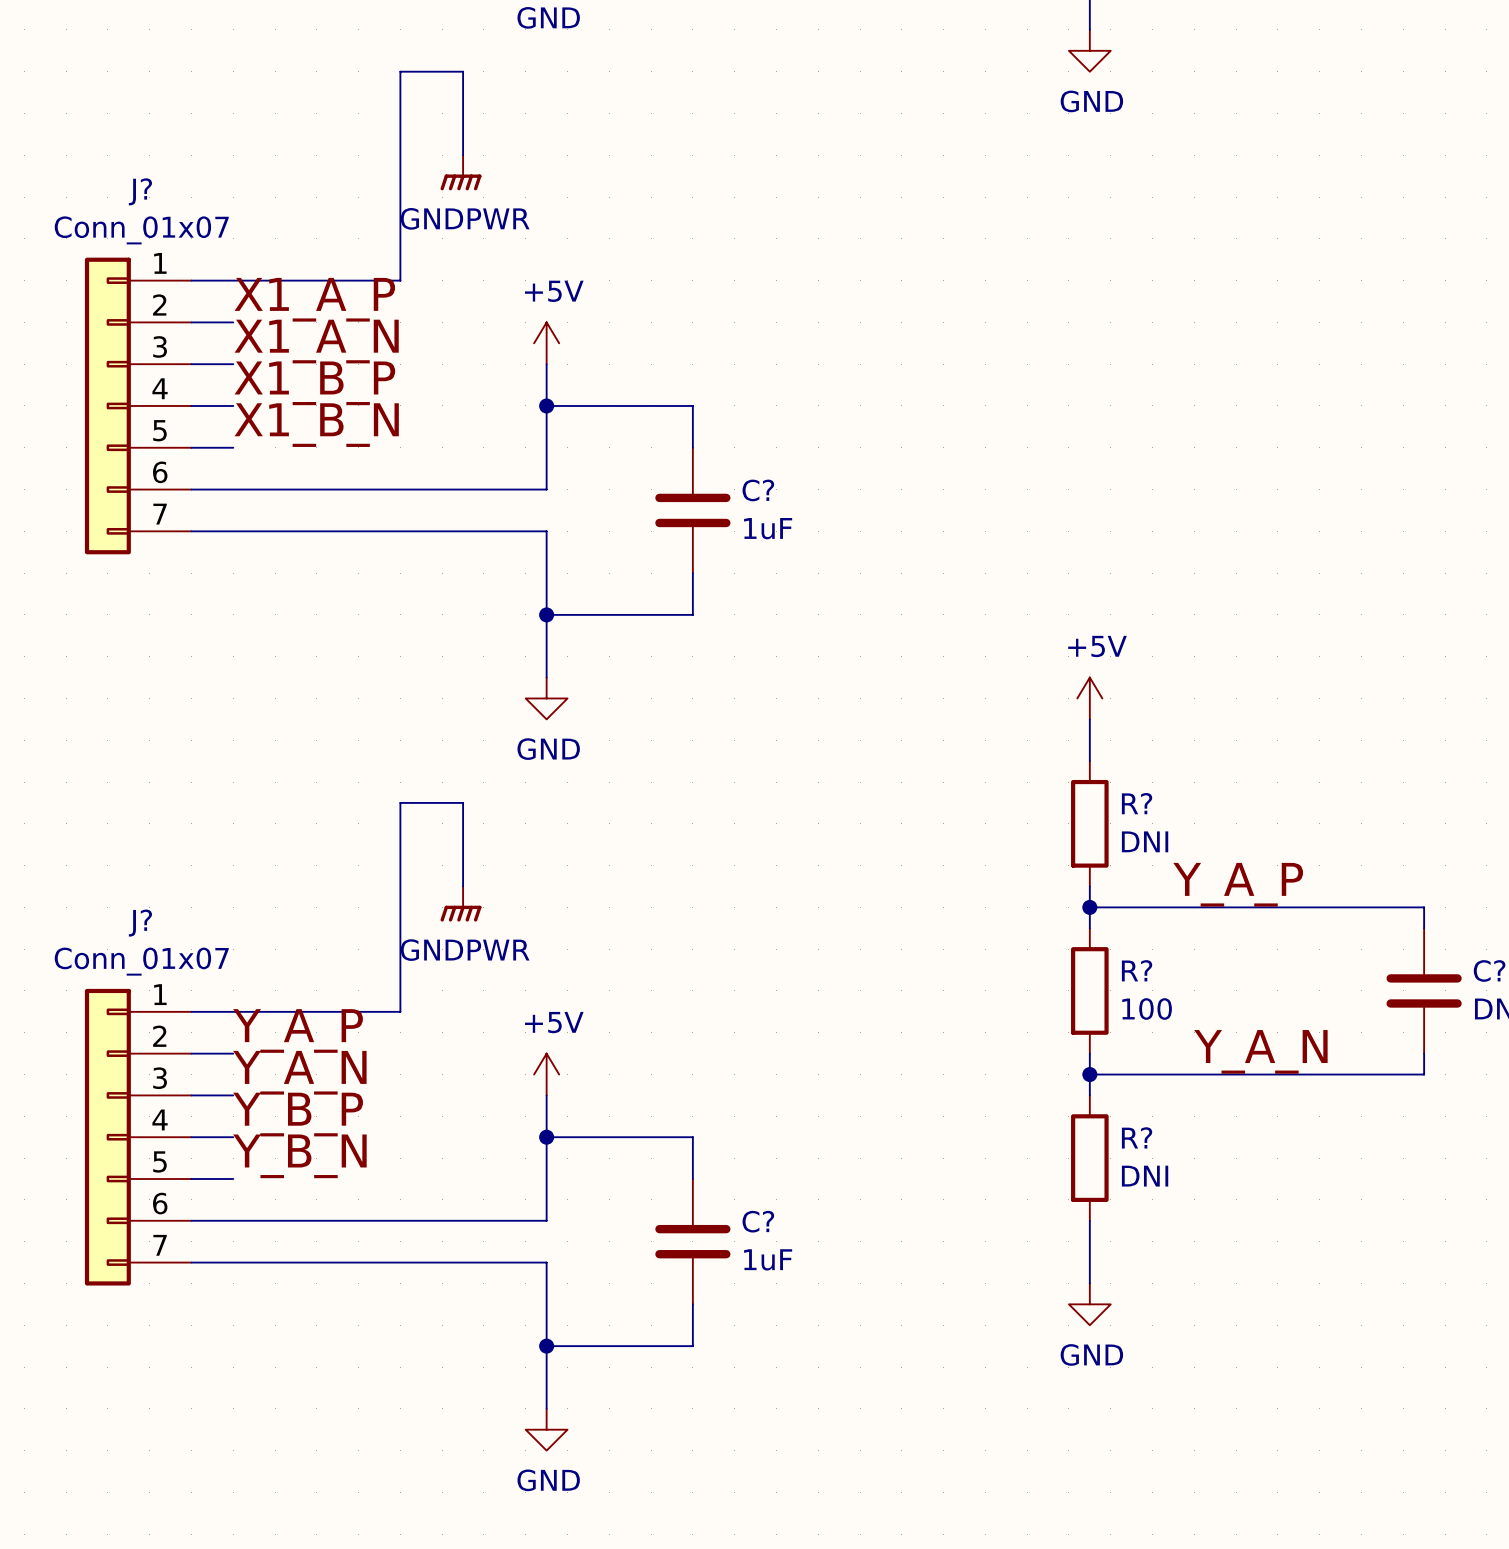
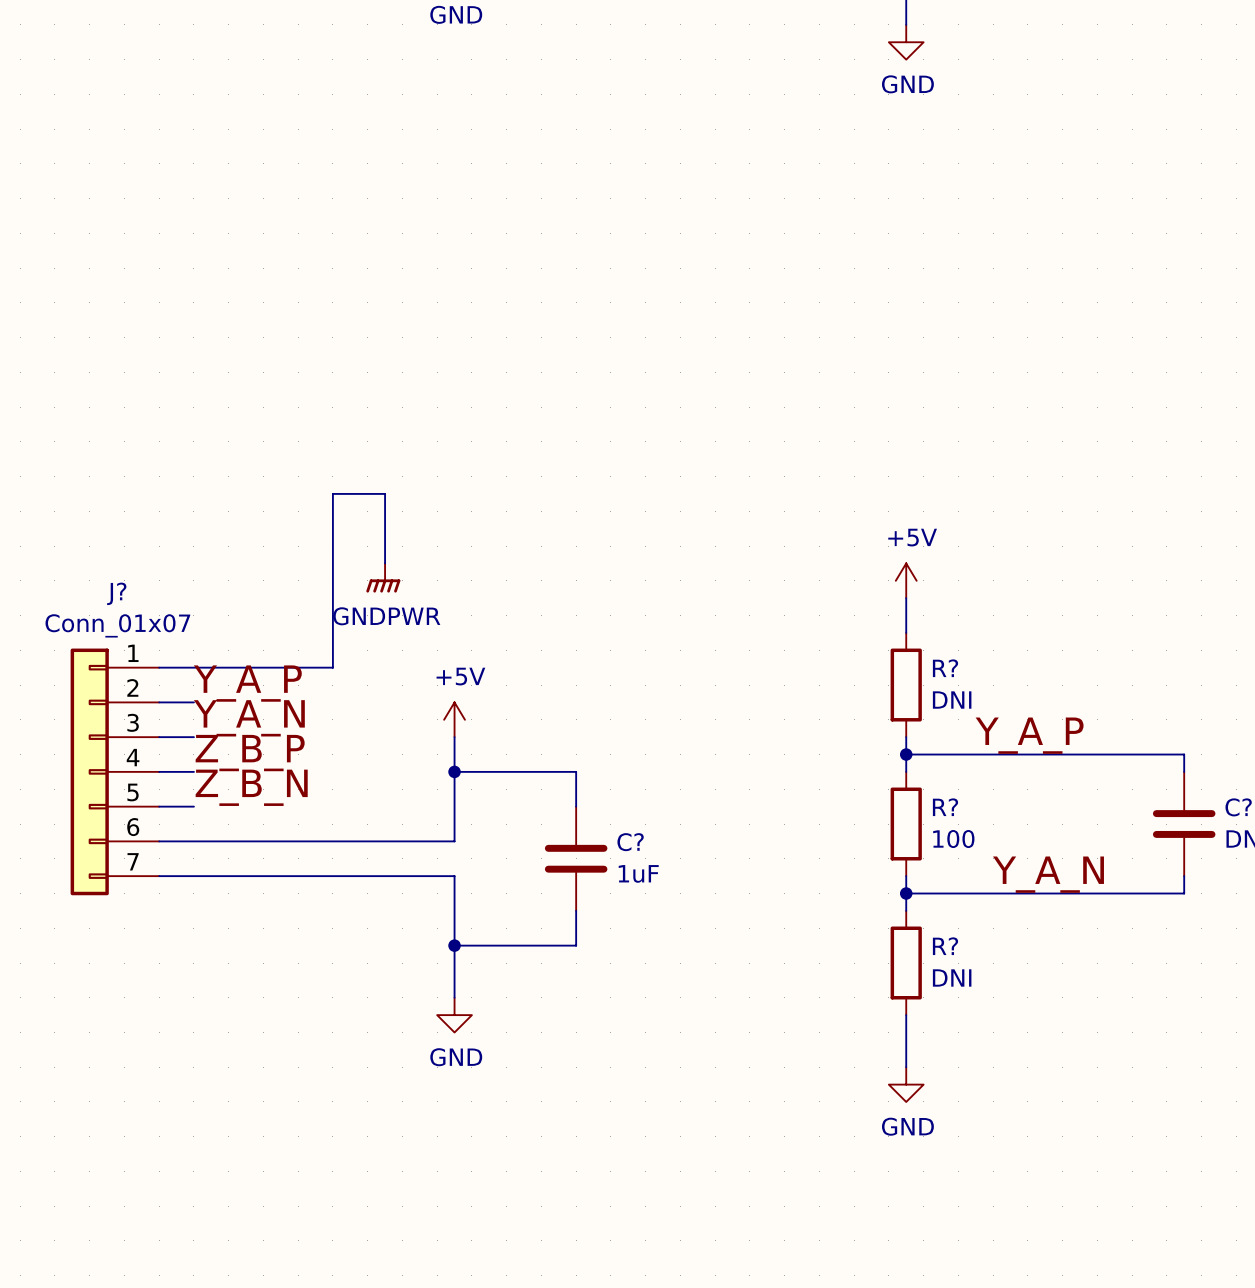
wire: (463, 155) (463, 71) (400, 71) (400, 280) (191, 280) -> none
power symbol: GNDPWR (460, 172) -> none
label: X1_A_P (314, 299) -> none
wire: (191, 322) (233, 322) -> none
label: X1_A_N (316, 341) -> none
power symbol: +5V (546, 343) -> none
wire: (191, 364) (233, 364) -> none
wire: (546, 364) (546, 489) (191, 489) -> none
label: X1_B_P (314, 383) -> none
J?: Conn_01x07 (138, 405) -> none
wire: (191, 405) (233, 405) -> none
wire: (546, 405) (692, 405) (692, 447) -> none
junction: (546, 405) -> none
label: X1_B_N (316, 425) -> none
wire: (191, 447) (233, 447) -> (159, 702) (193, 702)
C?: 1uF (692, 510) -> none
wire: (191, 531) (546, 531) (546, 677) -> none
wire: (692, 573) (692, 614) (546, 614) -> none
junction: (546, 614) -> none
wire: none -> (385, 563) (385, 493) (332, 493) (332, 667) (159, 667)
power symbol: GND (546, 698) -> none
wire: (463, 886) (463, 802) (400, 802) (400, 1011) -> (454, 737) (454, 841) (332, 841)
power symbol position: GNDPWR (460, 904) -> GNDPWR (383, 578)
label: none -> Z_B_P (250, 753)
wire: none -> (454, 771) (576, 771) (576, 806)
junction: none -> (454, 771)
label: none -> Z_B_N (251, 787)
label position: Y_A_P (298, 1030) -> Y_A_P (247, 683)
wire: none -> (193, 876) (454, 876) (454, 910)
label position: Y_A_N (299, 1072) -> Y_A_N (249, 718)
power symbol position: +5V (546, 1074) -> +5V (454, 719)
wire: (191, 1095) (233, 1095) -> (159, 737) (193, 737)
label: Y_B_P (298, 1114) -> none
J? position: (138, 1137) -> (114, 771)
wire: (191, 1137) (233, 1137) -> (159, 771) (193, 771)
wire: (692, 1137) (692, 1178) -> (576, 945) (576, 910)
label: Y_B_N (299, 1156) -> none
wire: (191, 1178) (233, 1178) -> (159, 806) (193, 806)
wire: (546, 1199) (546, 1220) (191, 1220) -> none
C? position: (692, 1241) -> (576, 858)
wire: (191, 1262) (546, 1262) (546, 1408) -> none
wire: (692, 1304) (692, 1346) (546, 1346) -> none
junction: (546, 1346) -> none
power symbol position: GND (546, 1429) -> GND (454, 1015)

